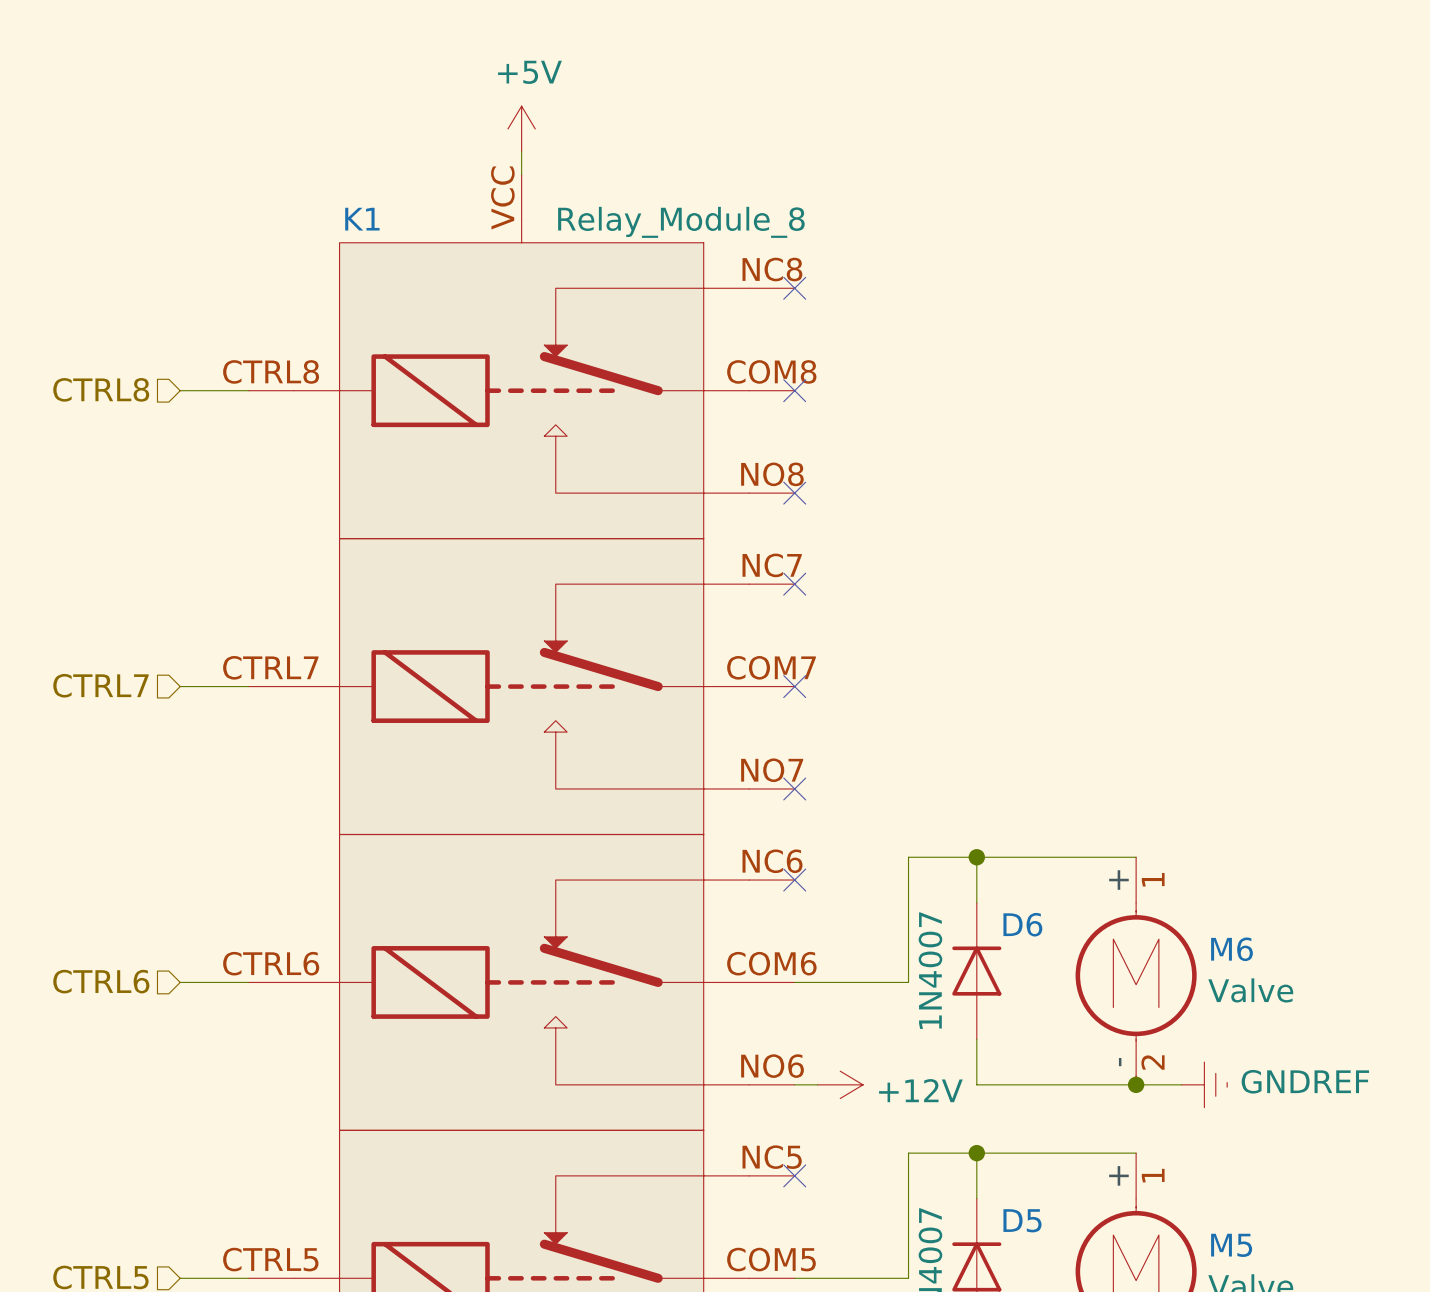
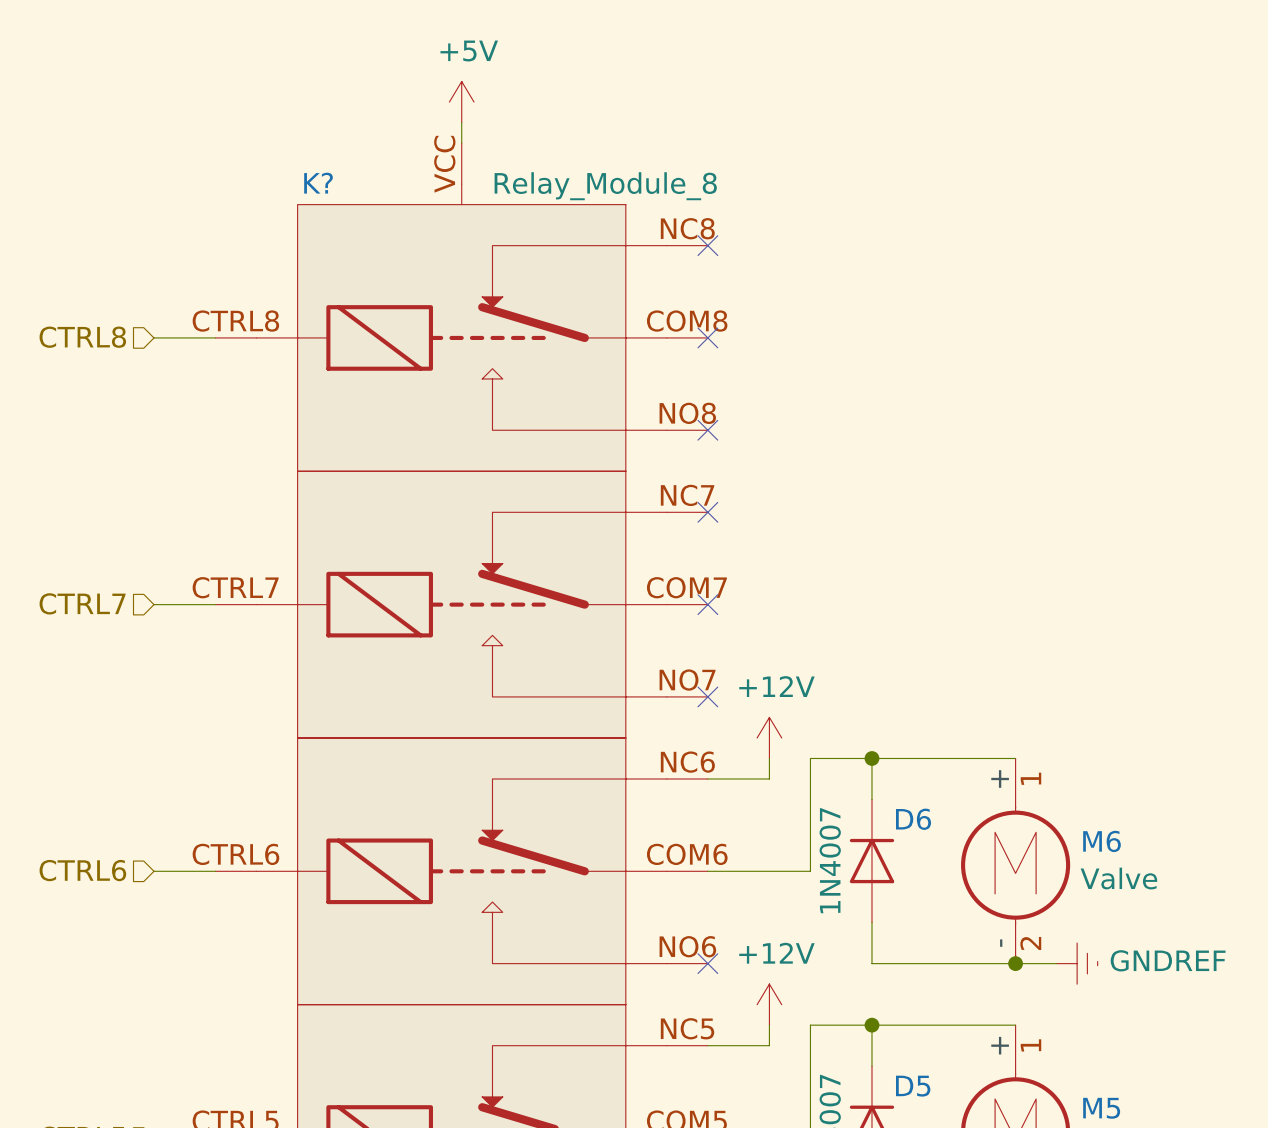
K1 name: K1 (362, 219) -> K? (318, 183)
power symbol: none -> +12V (769, 737)
wire: none -> (769, 758) (769, 779) (707, 779)
no-connect mark: (794, 880) -> none
wire: (794, 1084) (817, 1084) -> none
power symbol rotation: 0° (840, 1084) -> 90° counterclockwise (769, 1004)
power symbol position: +12V (840, 1084) -> +12V (769, 1004)
wire: none -> (769, 1025) (769, 1045) (707, 1045)
no-connect mark position: (794, 1175) -> (707, 963)

